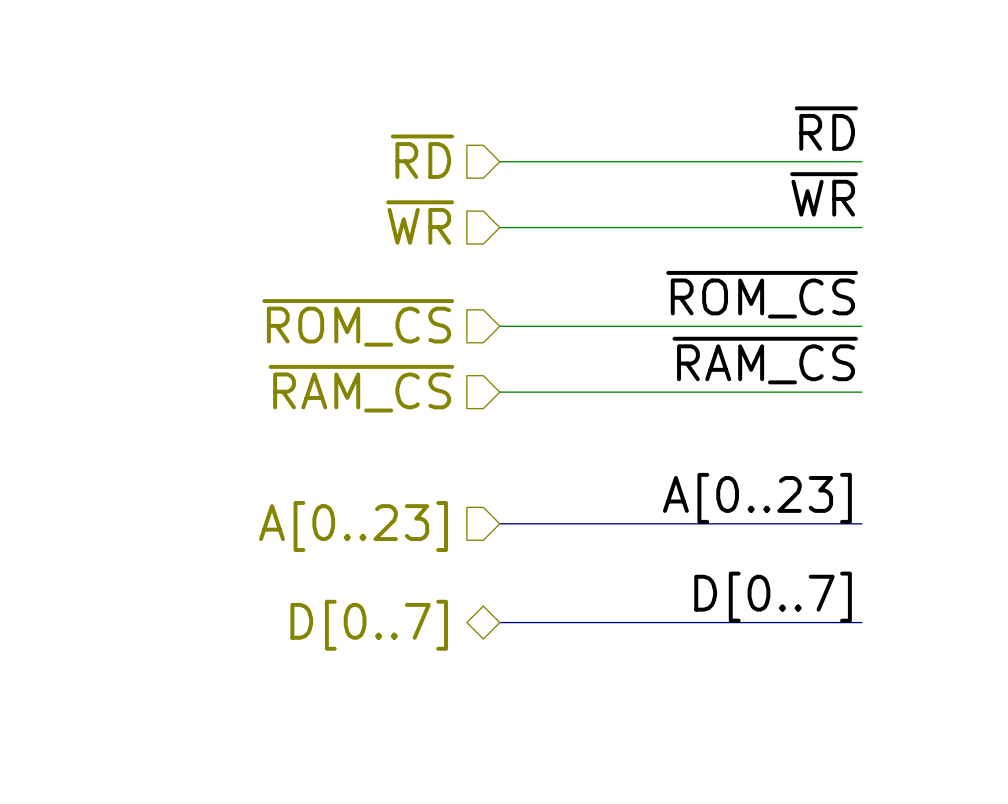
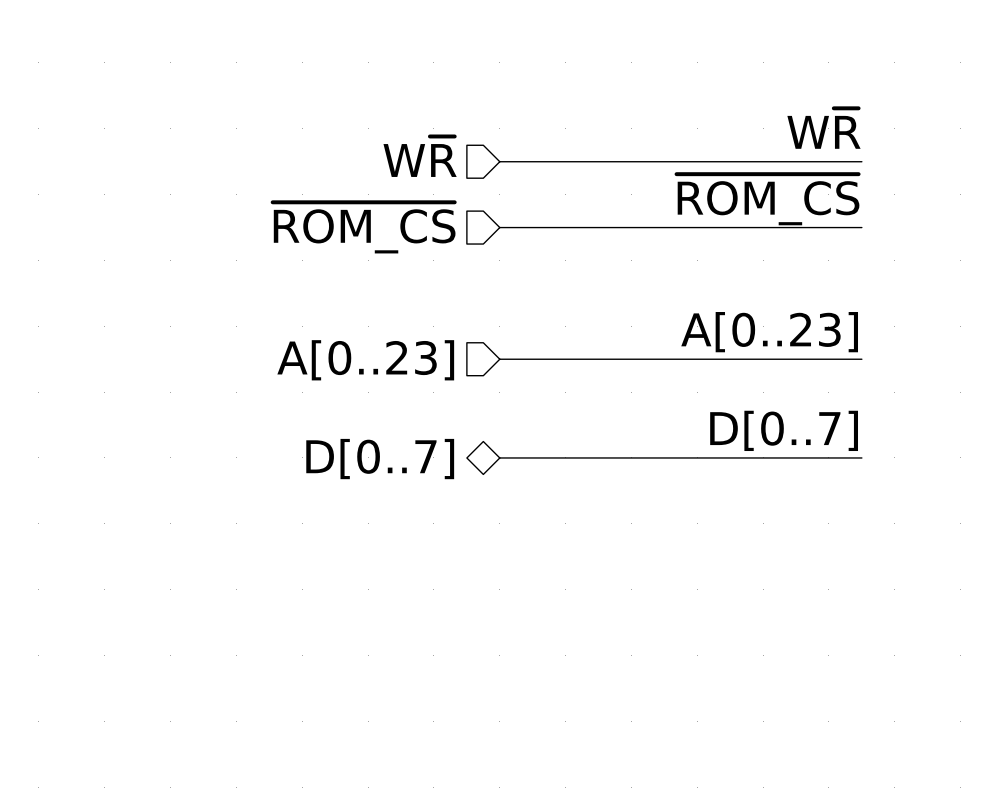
label: ~{RD} (826, 128) -> W~{R} (823, 128)
hierarchical label: ~{RD} (422, 156) -> W~{R} (420, 156)
label: ~{WR} (824, 194) -> ~{ROM_CS} (767, 199)
hierarchical label: ~{WR} (420, 222) -> ~{ROM_CS} (364, 227)
label: ~{ROM_CS} (762, 294) -> none
hierarchical label: ~{ROM_CS} (358, 322) -> none
wire: (499, 326) (861, 326) -> none
label: ~{RAM_CS} (765, 360) -> none
hierarchical label: ~{RAM_CS} (361, 388) -> none
wire: (499, 392) (861, 392) -> none
label position: A[0..23] (757, 498) -> A[0..23] (769, 332)
bus: (499, 523) (861, 523) -> (499, 359) (861, 359)
hierarchical label position: A[0..23] (353, 526) -> A[0..23] (365, 360)
label position: D[0..7] (773, 597) -> D[0..7] (784, 430)
bus: (499, 622) (861, 622) -> (499, 457) (861, 457)
hierarchical label position: D[0..7] (369, 625) -> D[0..7] (380, 459)

